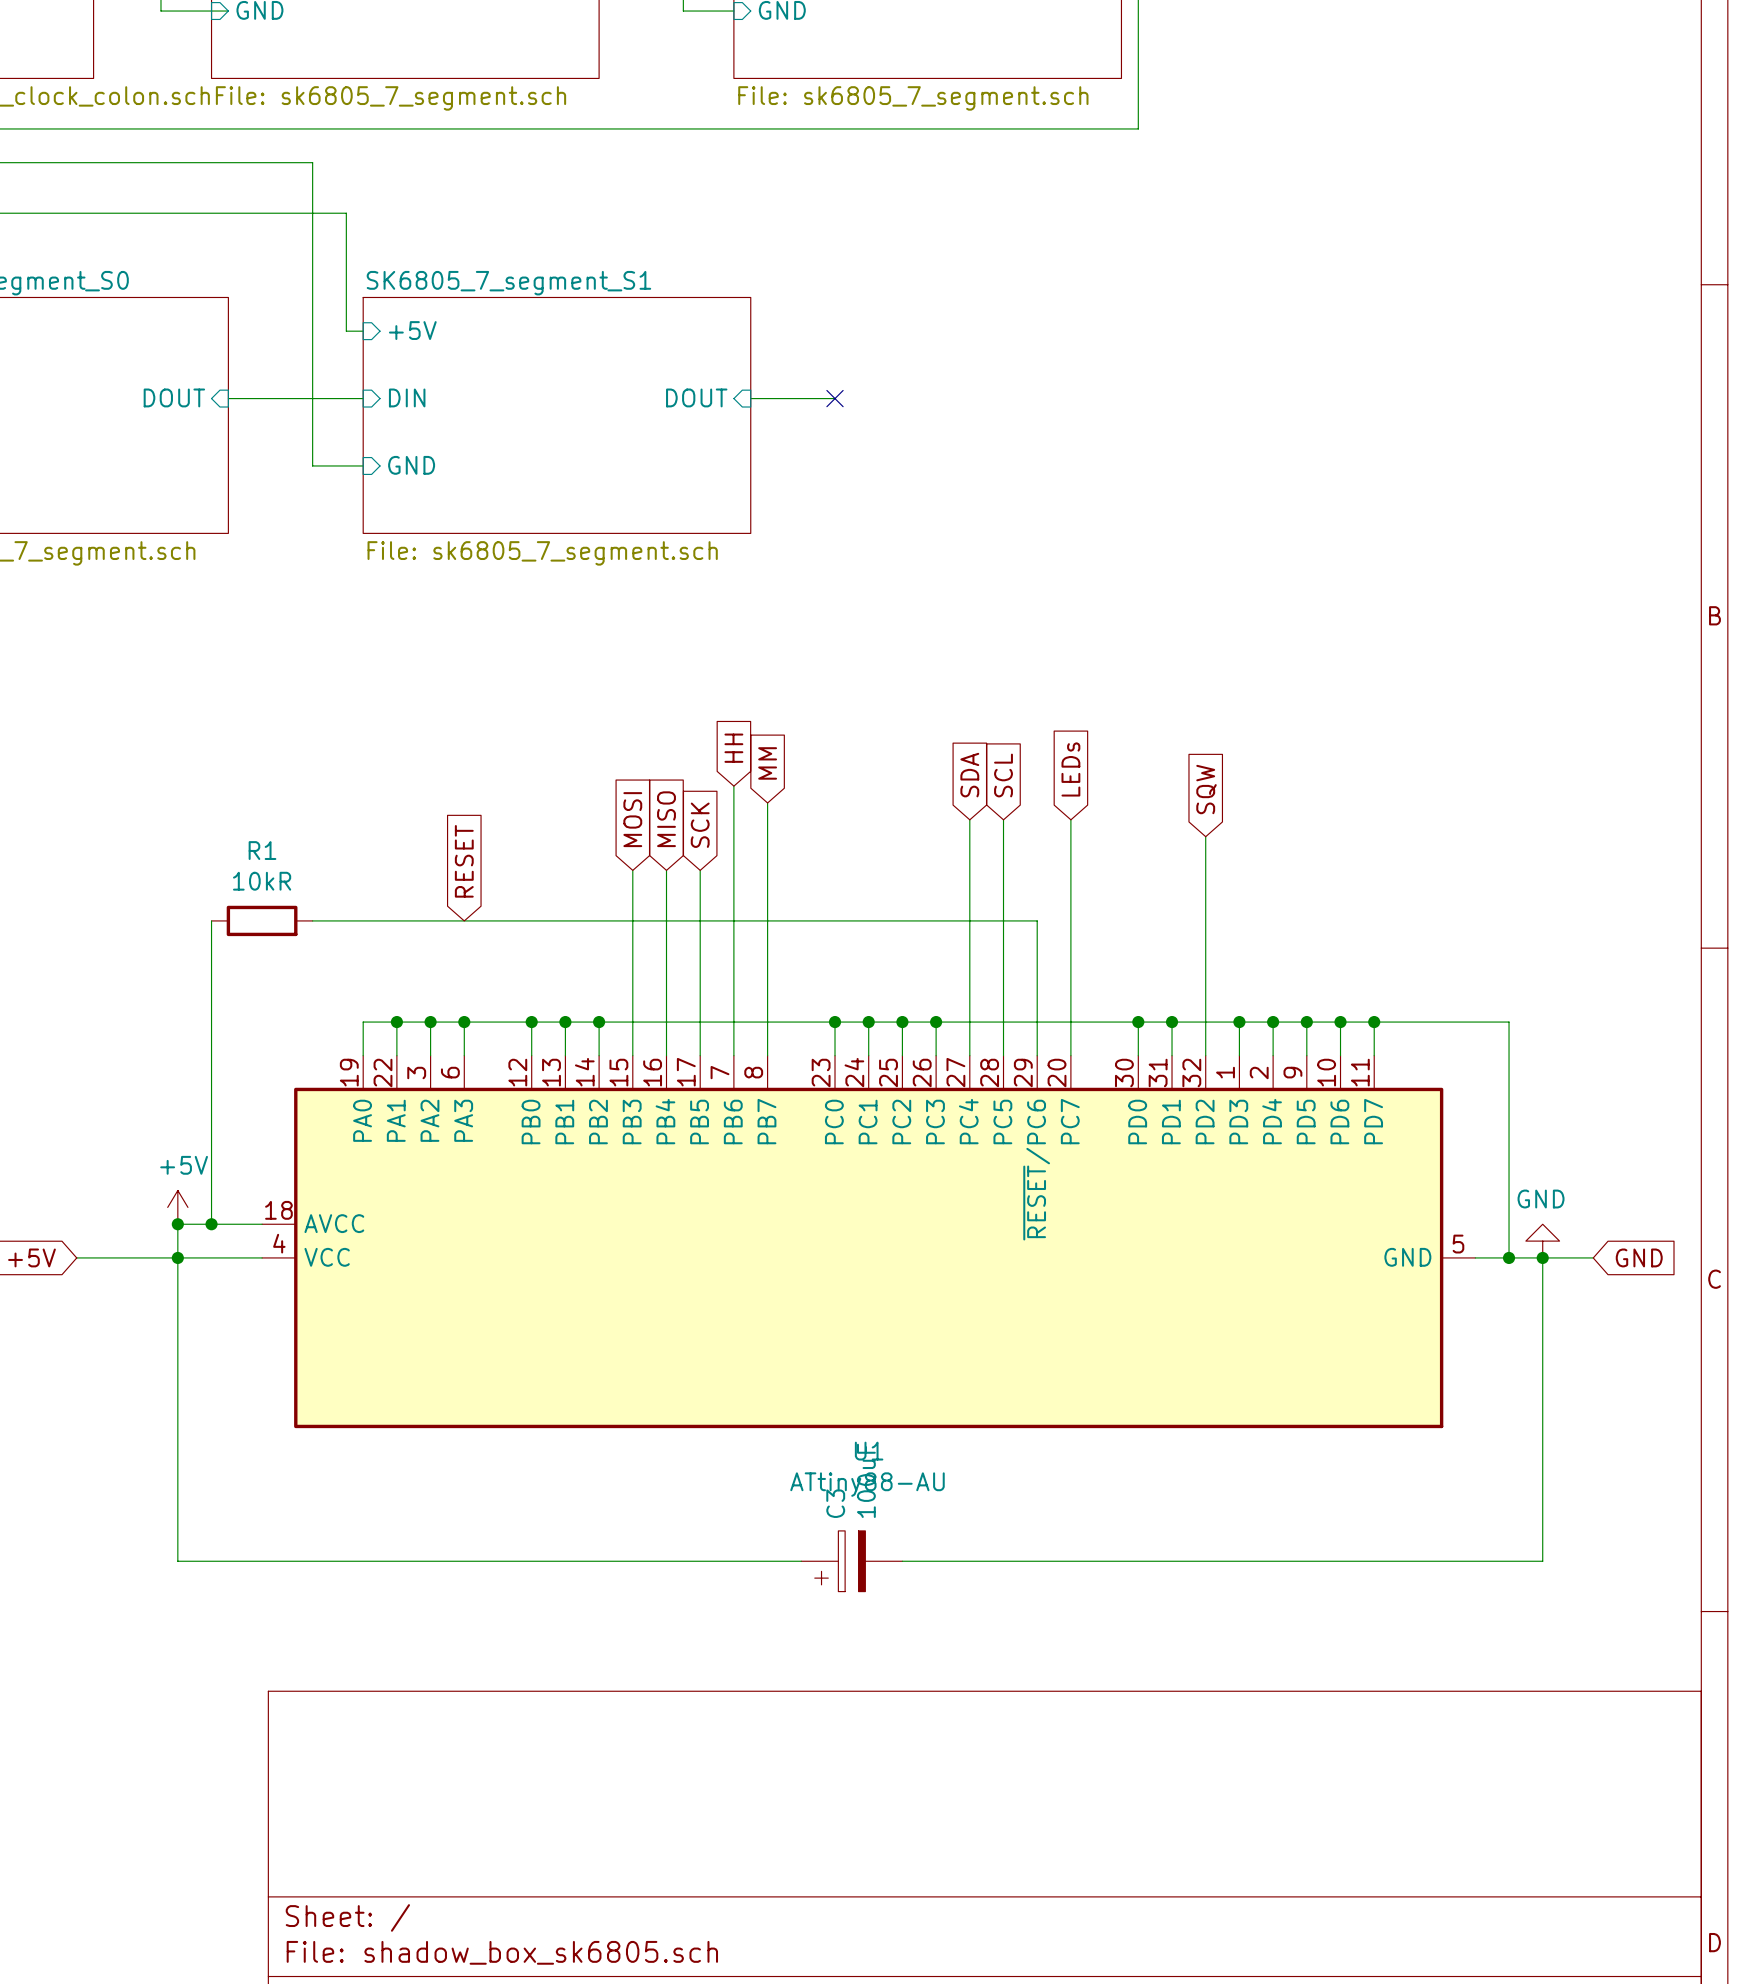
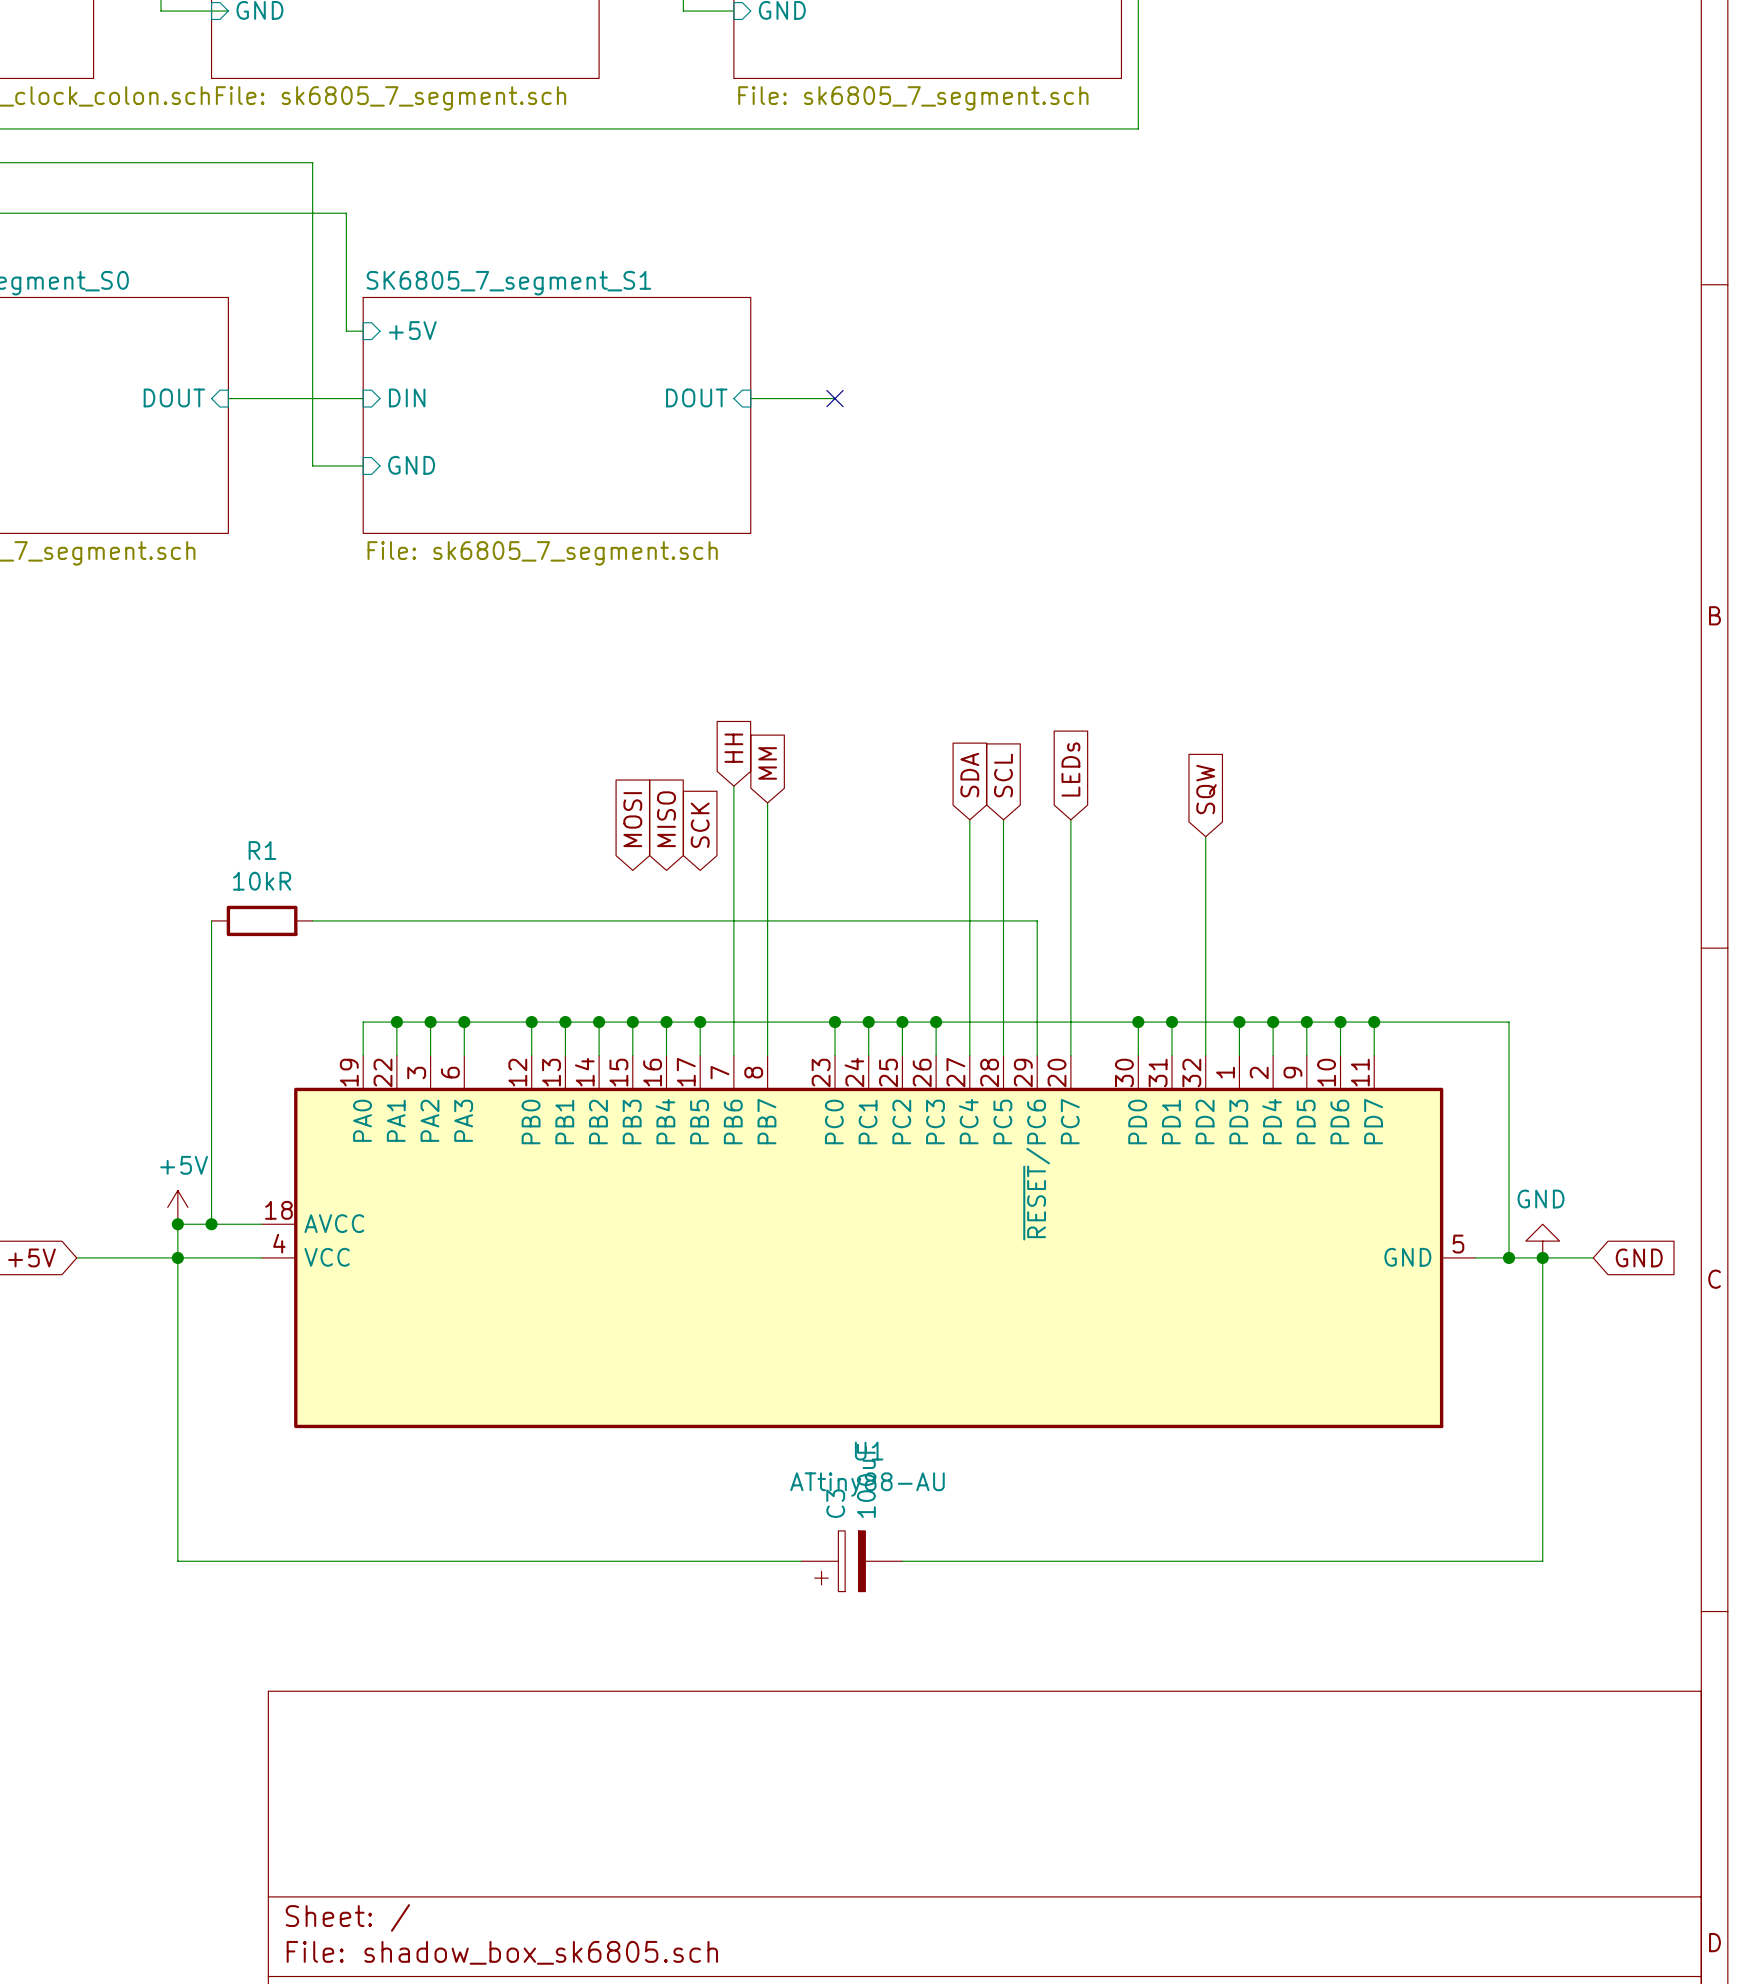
global label: RESET (464, 861) -> none
wire: (632, 870) (632, 1022) -> none
wire: (666, 870) (666, 1022) -> none
wire: (700, 870) (700, 1022) -> none
junction: none -> (632, 1022)
junction: none -> (666, 1022)
junction: none -> (700, 1022)

